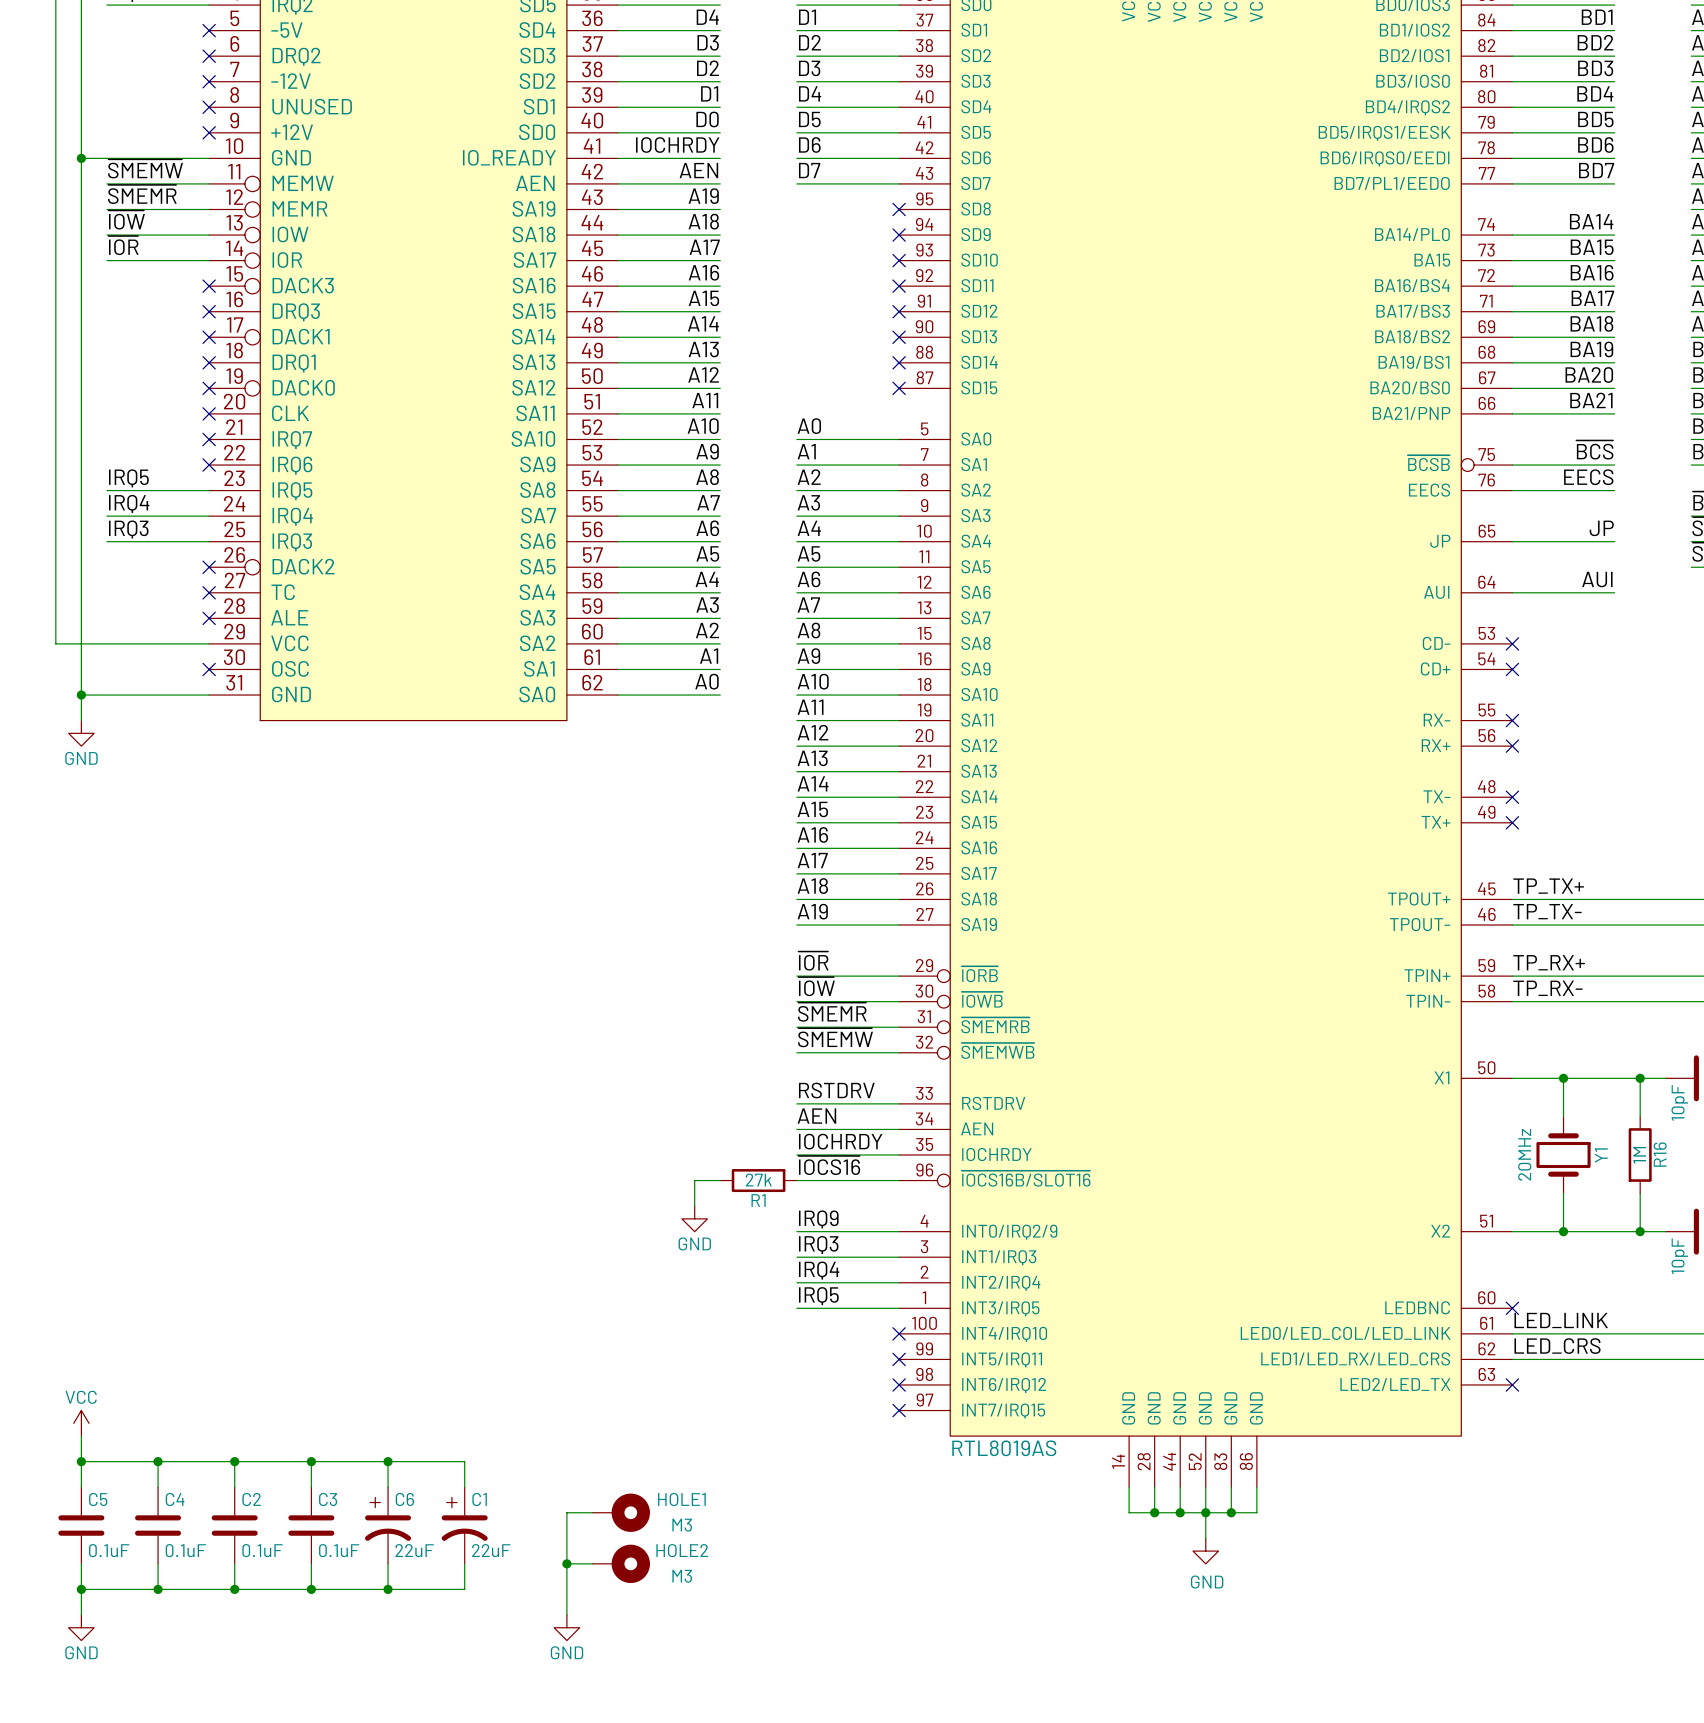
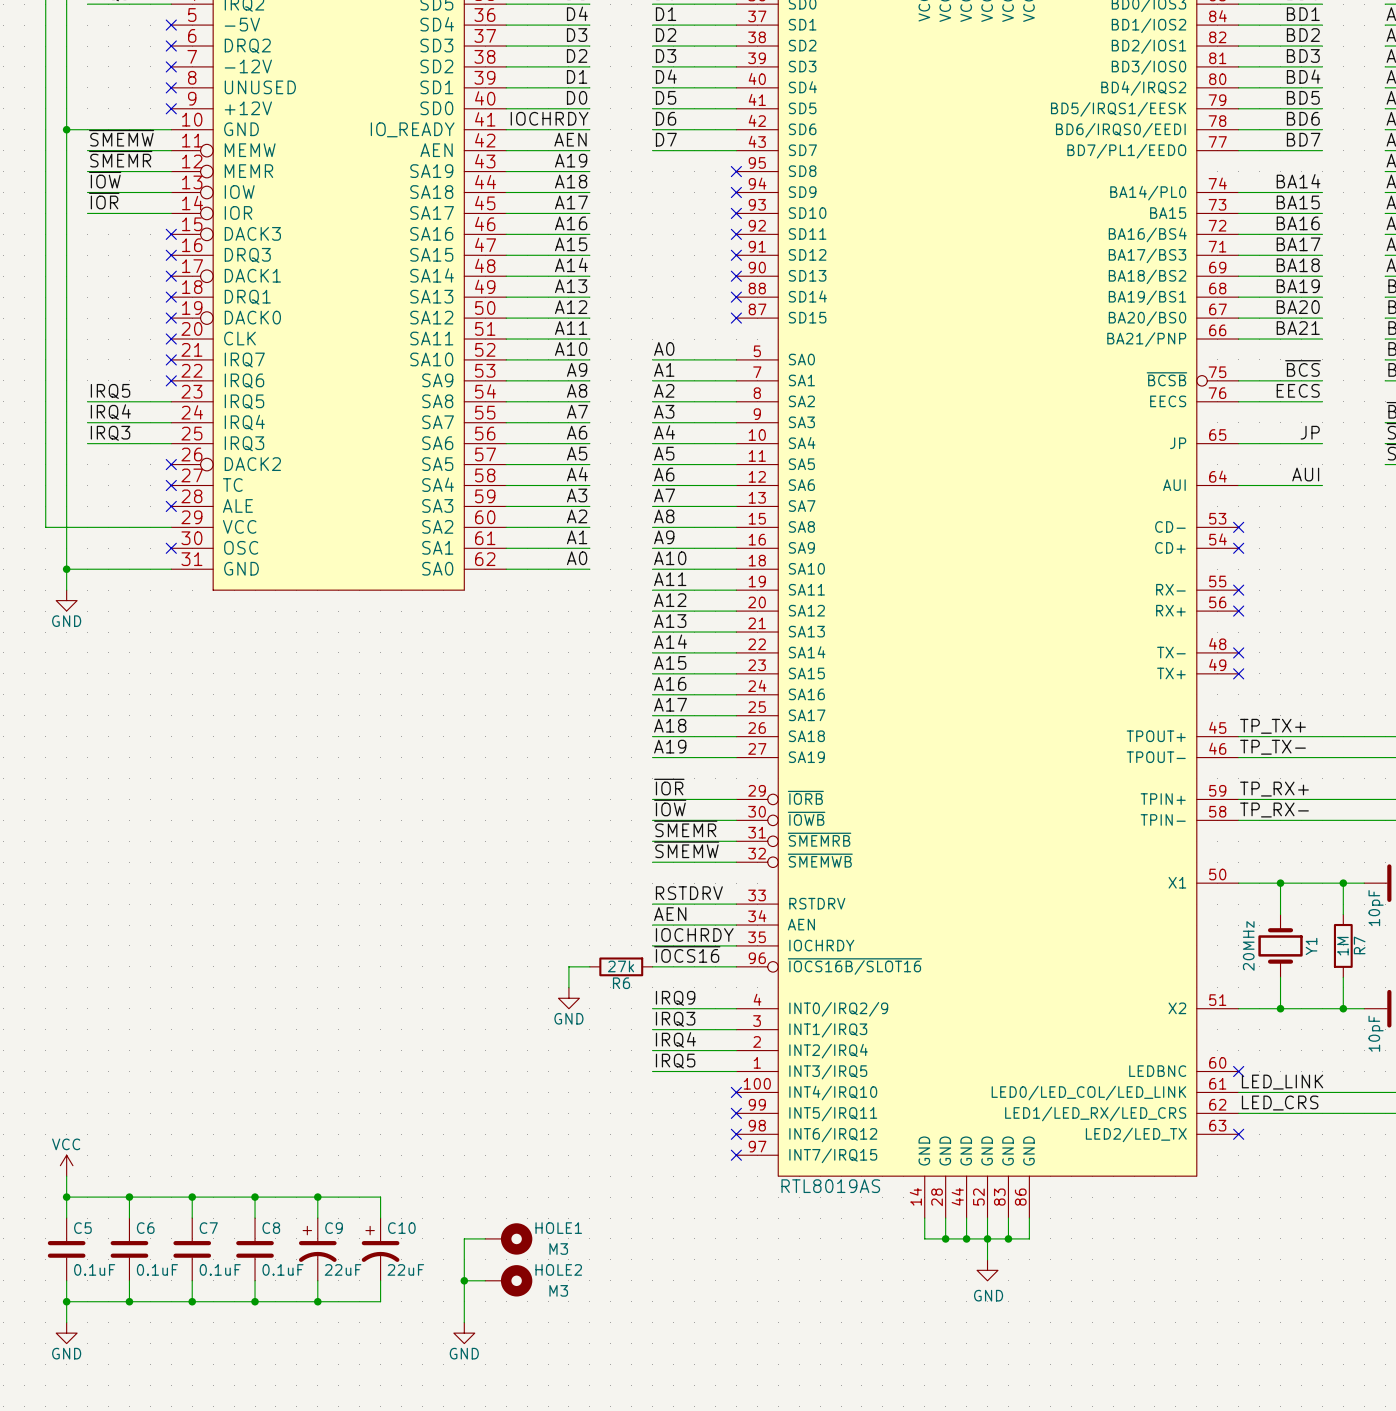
R16 name: R16 (1660, 1154) -> R7 (1359, 945)
R1 name: R1 (758, 1200) -> R6 (621, 983)
C4 name: C4 (175, 1499) -> C6 (145, 1228)
C2 name: C2 (251, 1499) -> C7 (208, 1228)
C3 name: C3 (328, 1499) -> C8 (271, 1228)
C6 name: C6 (404, 1499) -> C9 (334, 1228)
C1 name: C1 (479, 1499) -> C10 (401, 1228)

